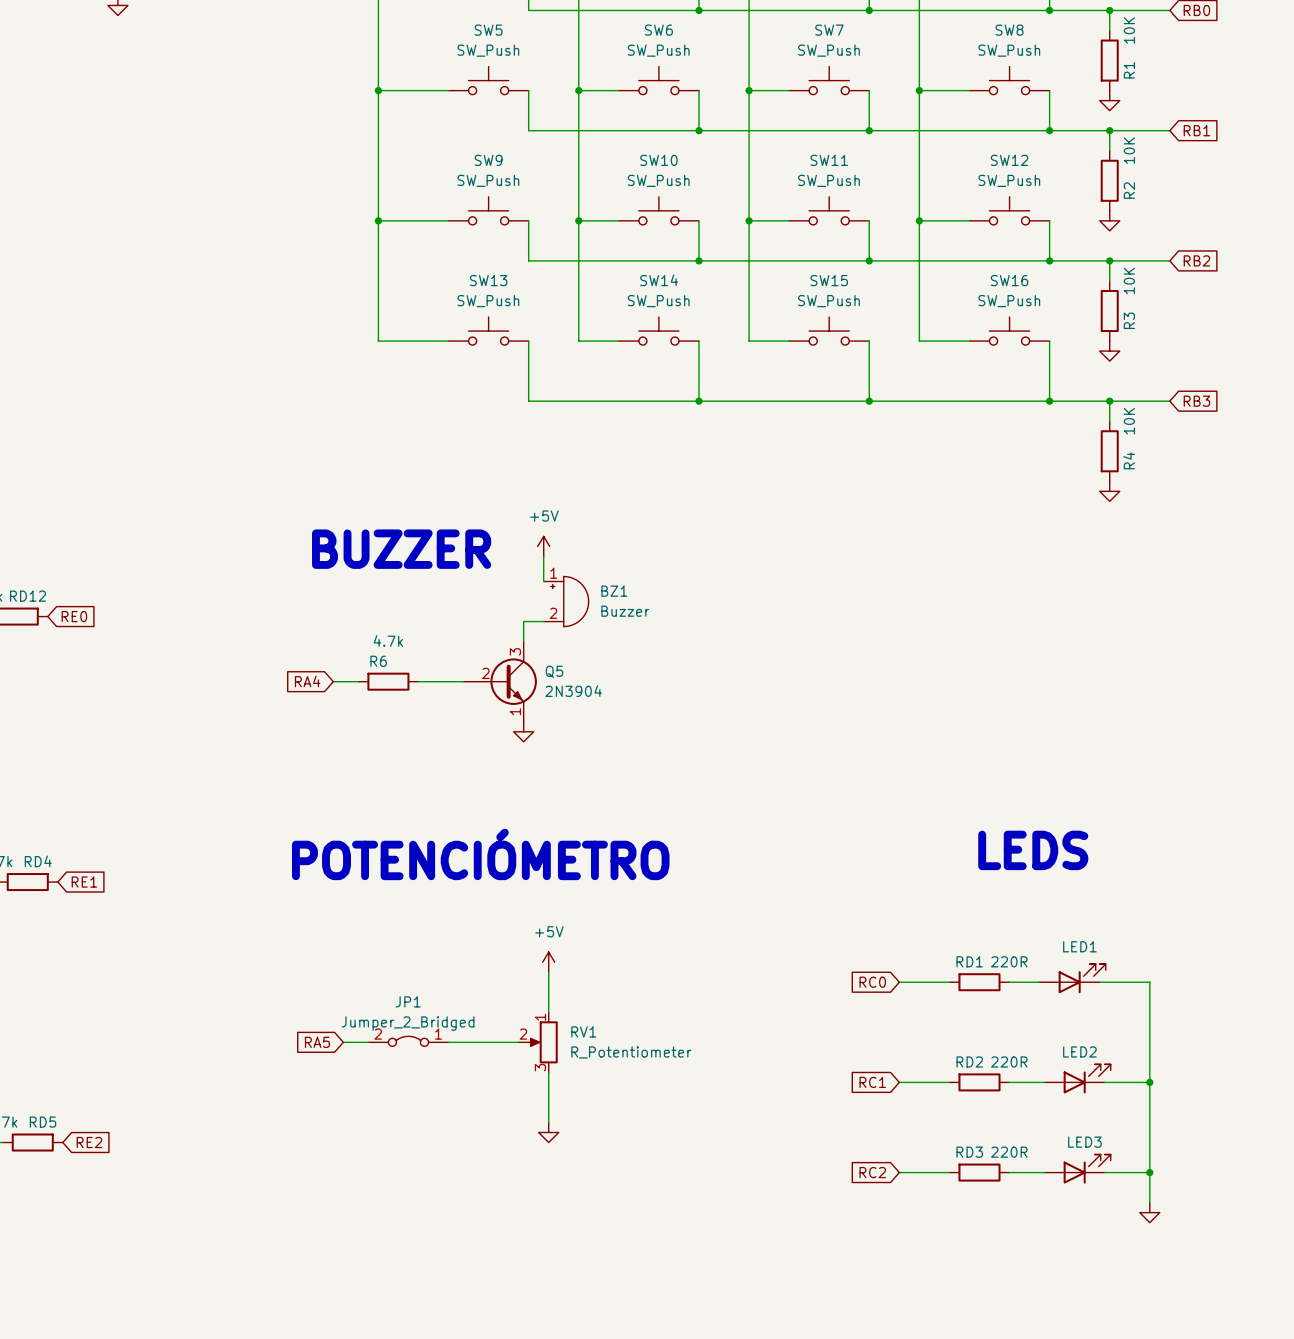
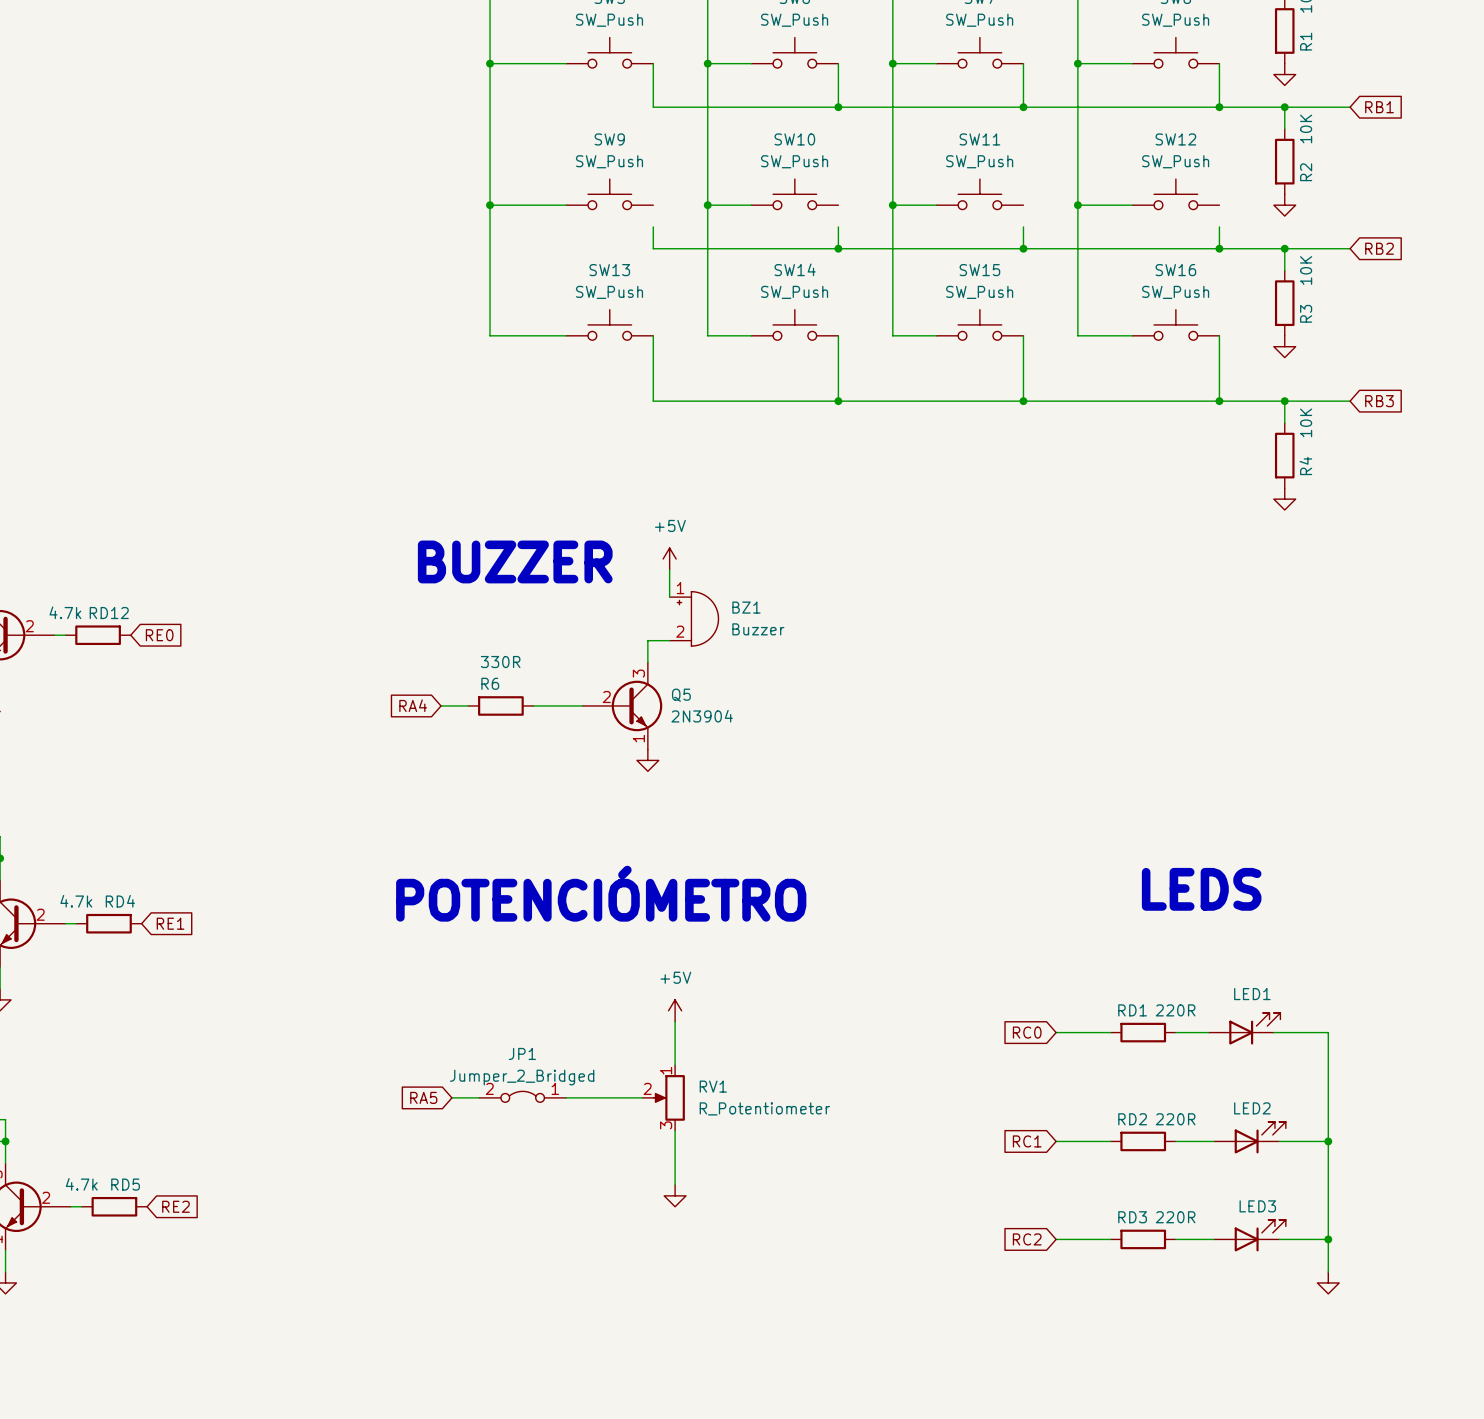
wire: (528, 220) (528, 240) -> none
wire: (698, 220) (698, 240) -> none
wire: (869, 220) (869, 240) -> none
wire: (1049, 220) (1049, 240) -> none
R6 value: 4.7k (388, 641) -> 330R (500, 662)

